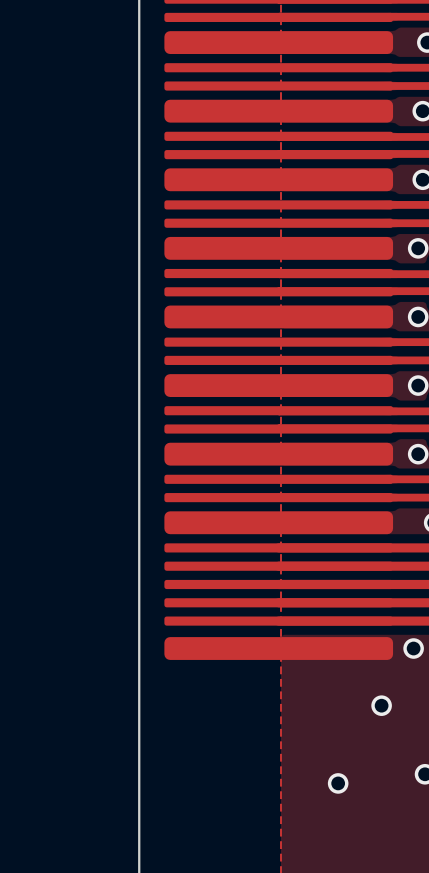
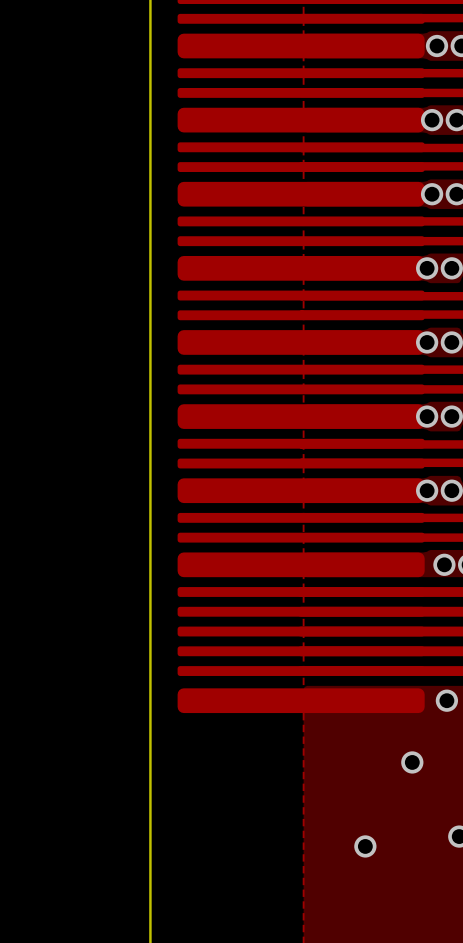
via: none -> (437, 46)
via: none -> (432, 120)
via: none -> (432, 194)
via: none -> (427, 268)
via: none -> (427, 342)
via: none -> (427, 416)
via: none -> (427, 490)
via: none -> (444, 564)

